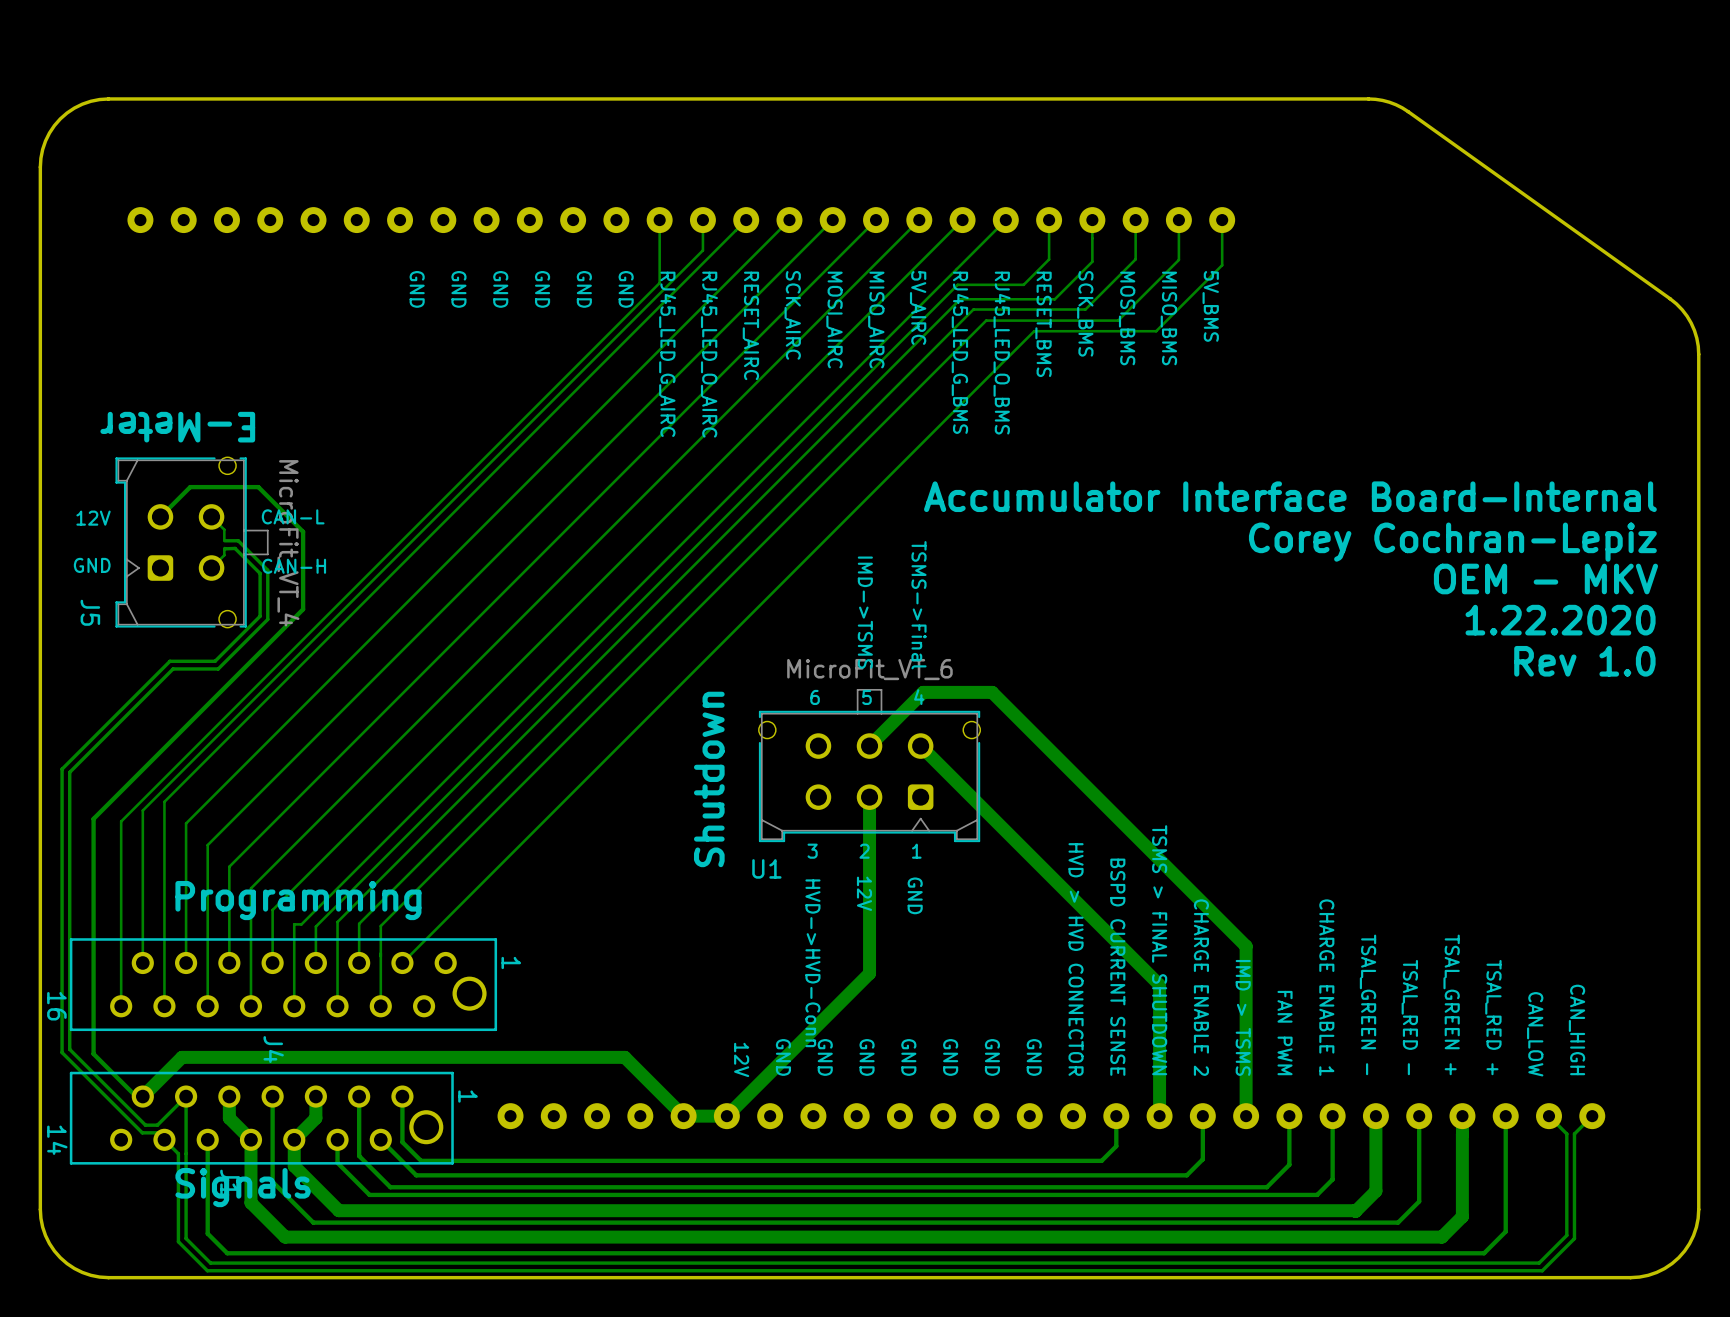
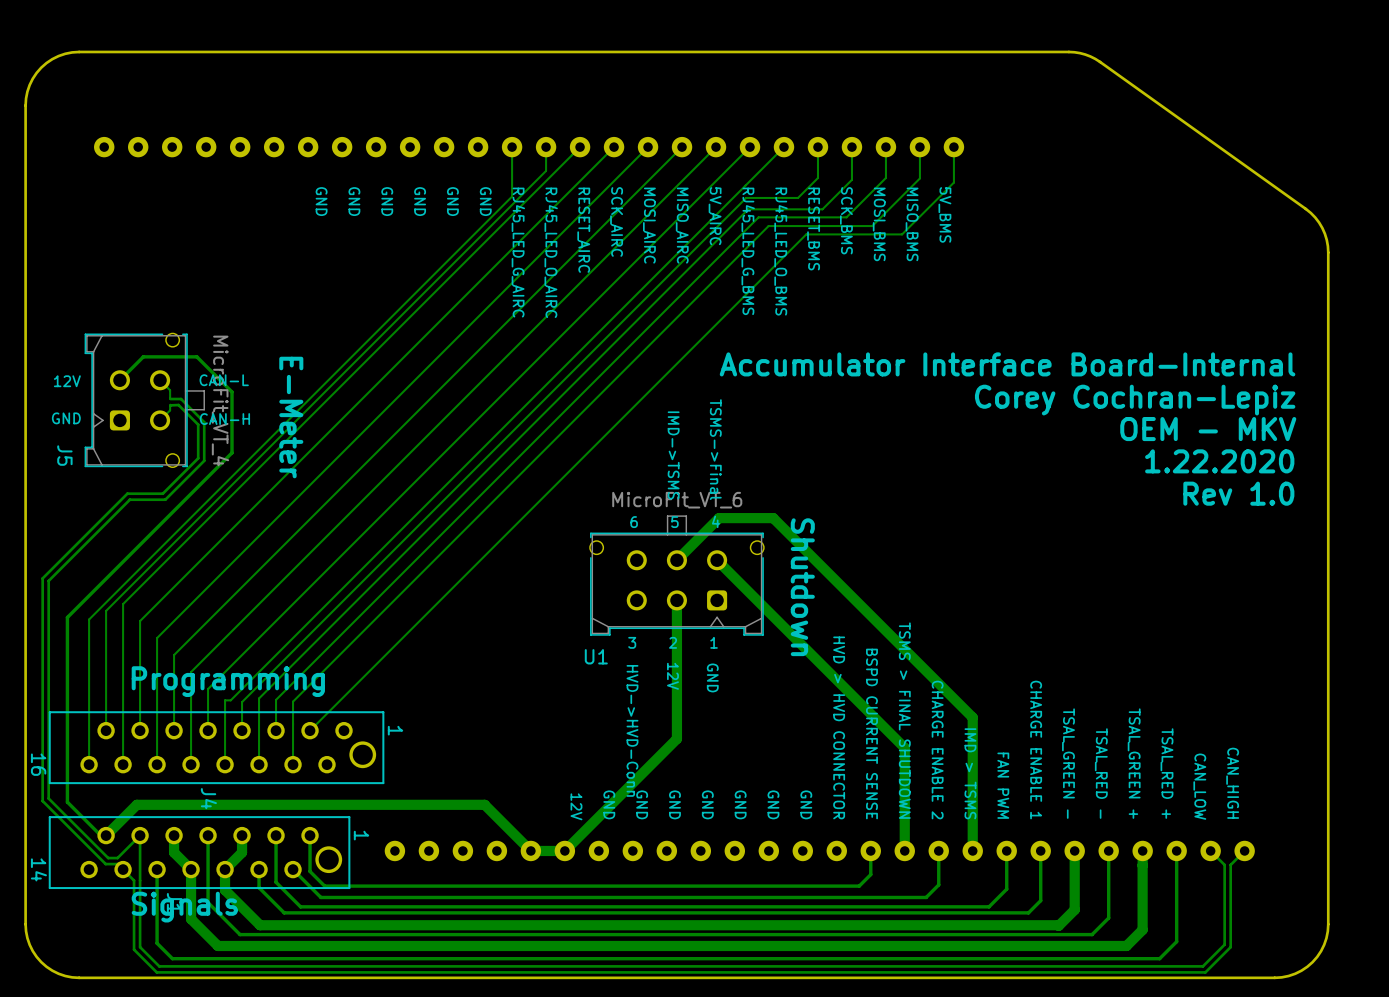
text rotation: 0° (177, 427) -> 90° counterclockwise (291, 417)
text position: E-Meter (177, 427) -> E-Meter (291, 417)
text rotation: 0° (709, 779) -> 180° (802, 587)
text position: Shutdown (709, 779) -> Shutdown (802, 587)

